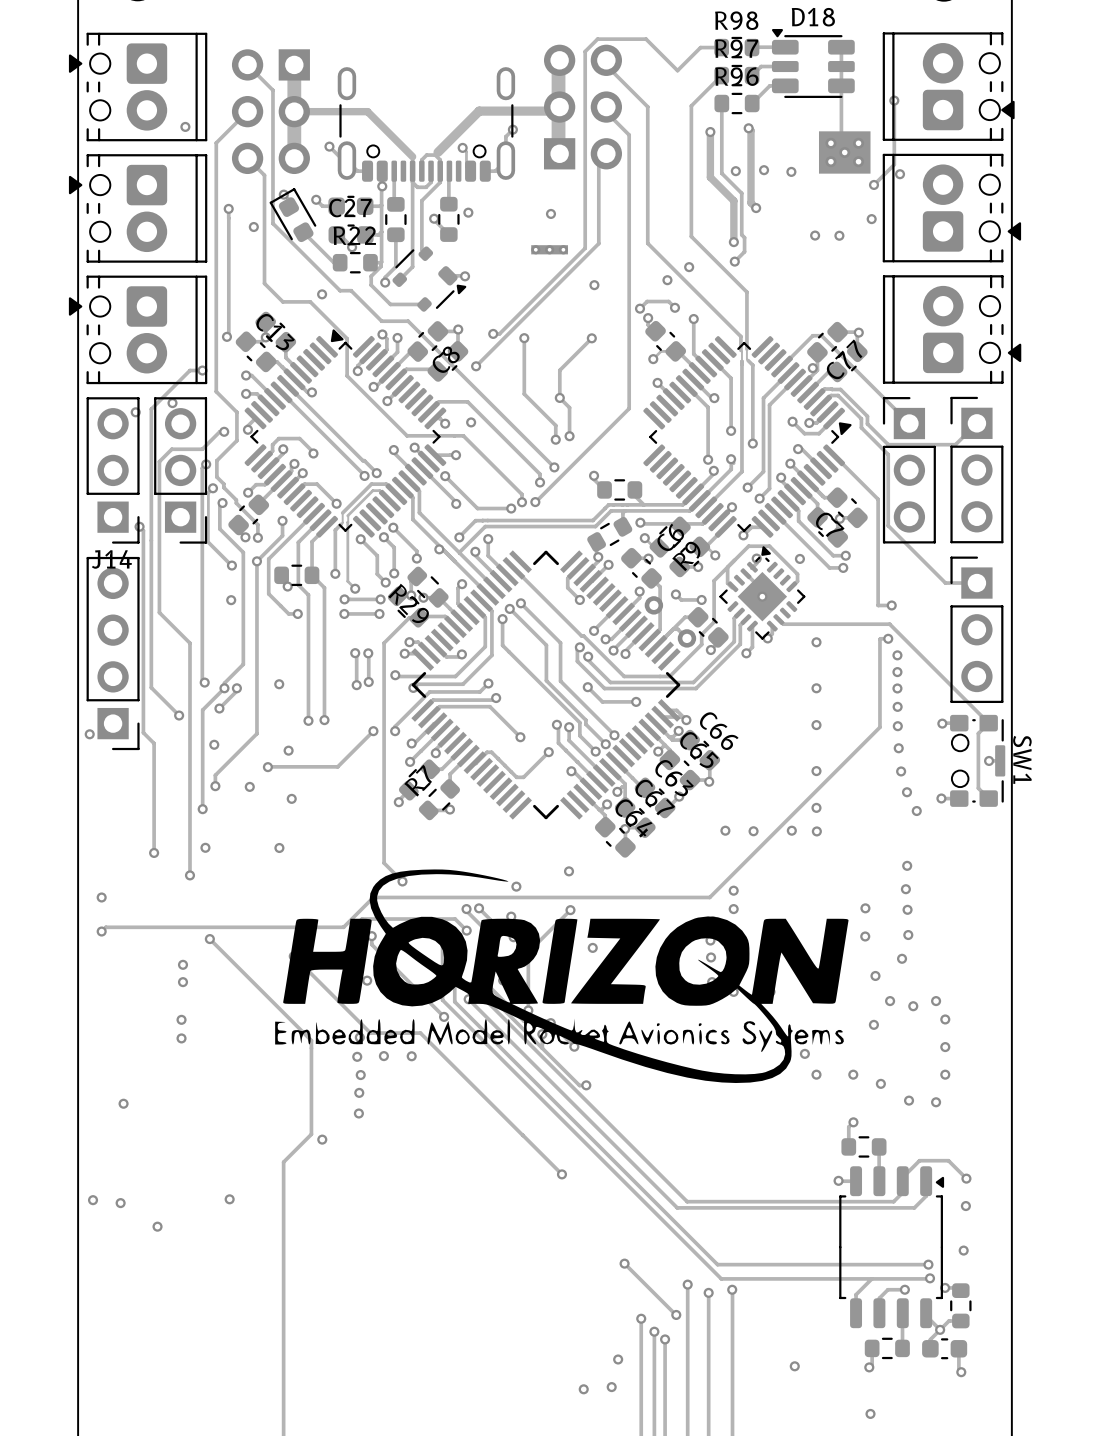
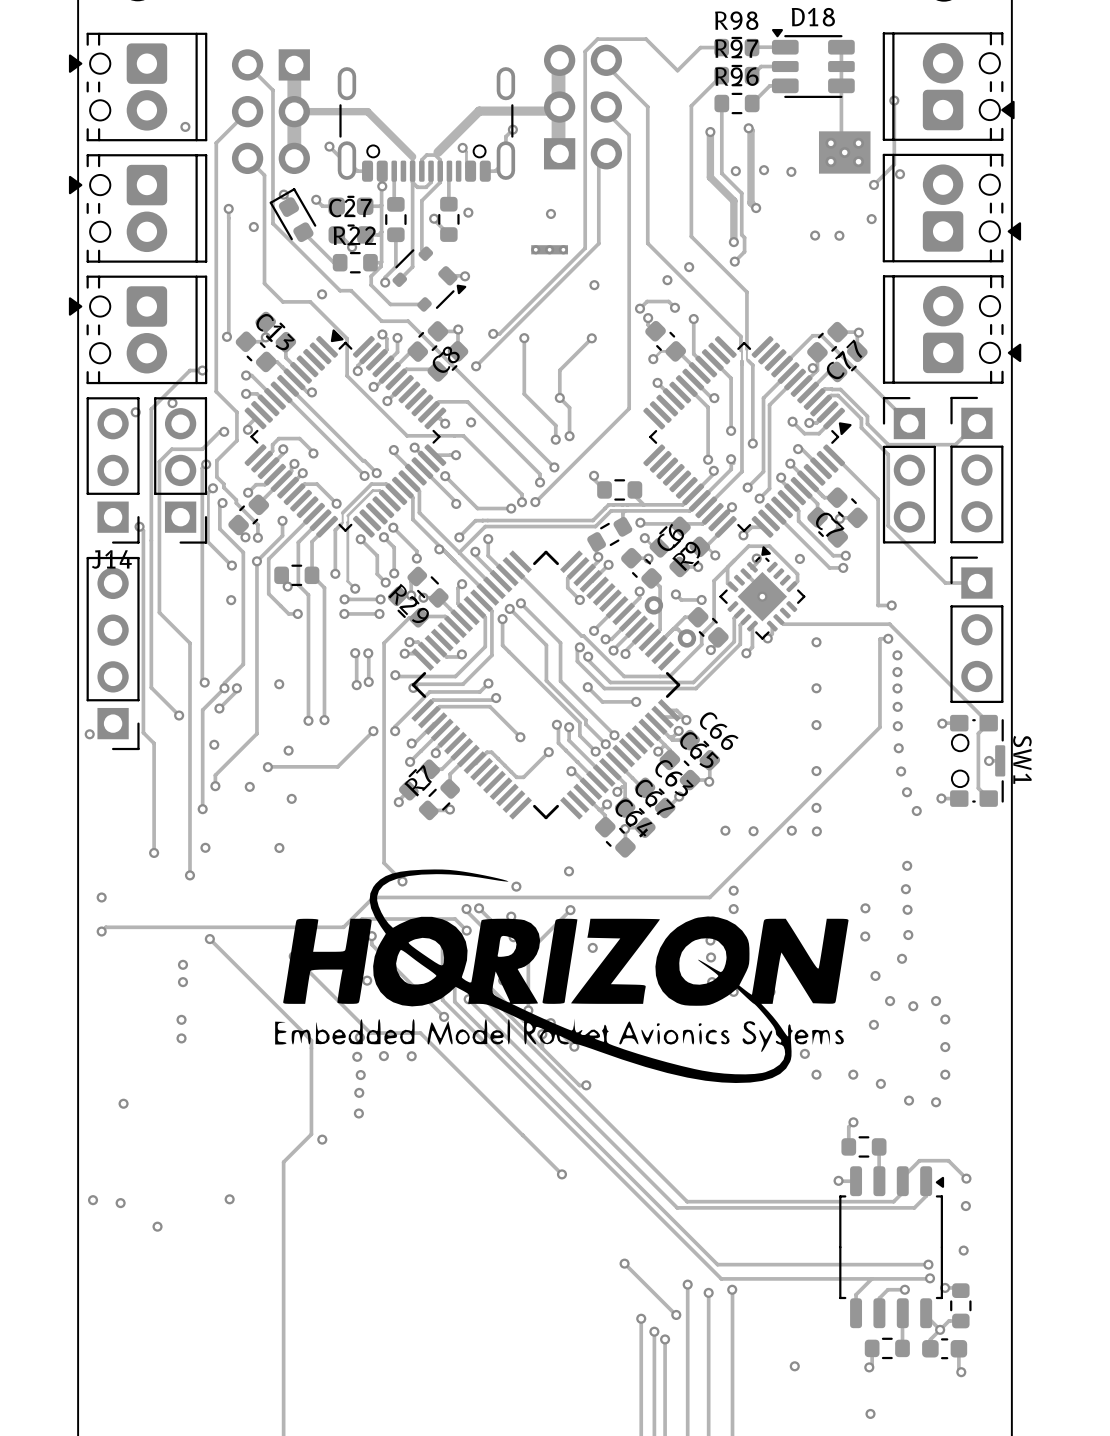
via: (618, 1359) -> none
via: (611, 1387) -> none
via: (583, 1389) -> none

